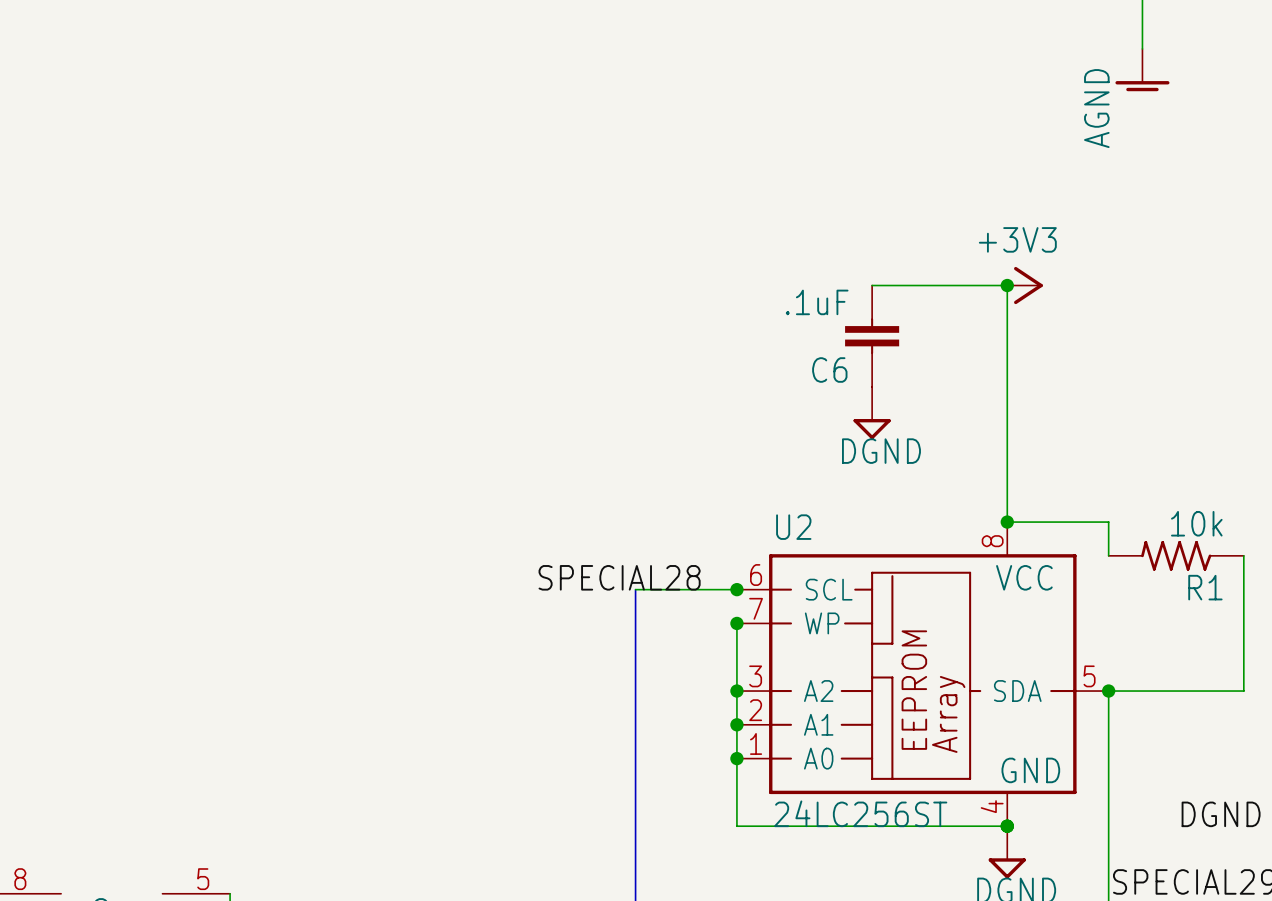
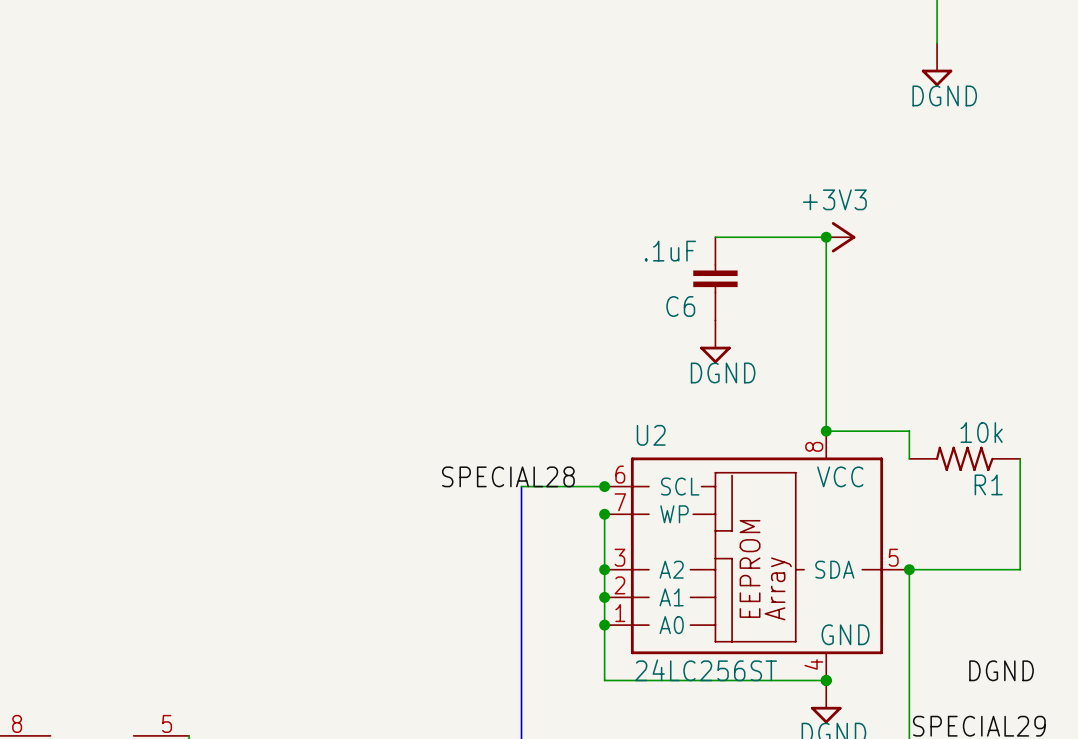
power symbol: AGND (1142, 70) -> DGND (937, 64)

